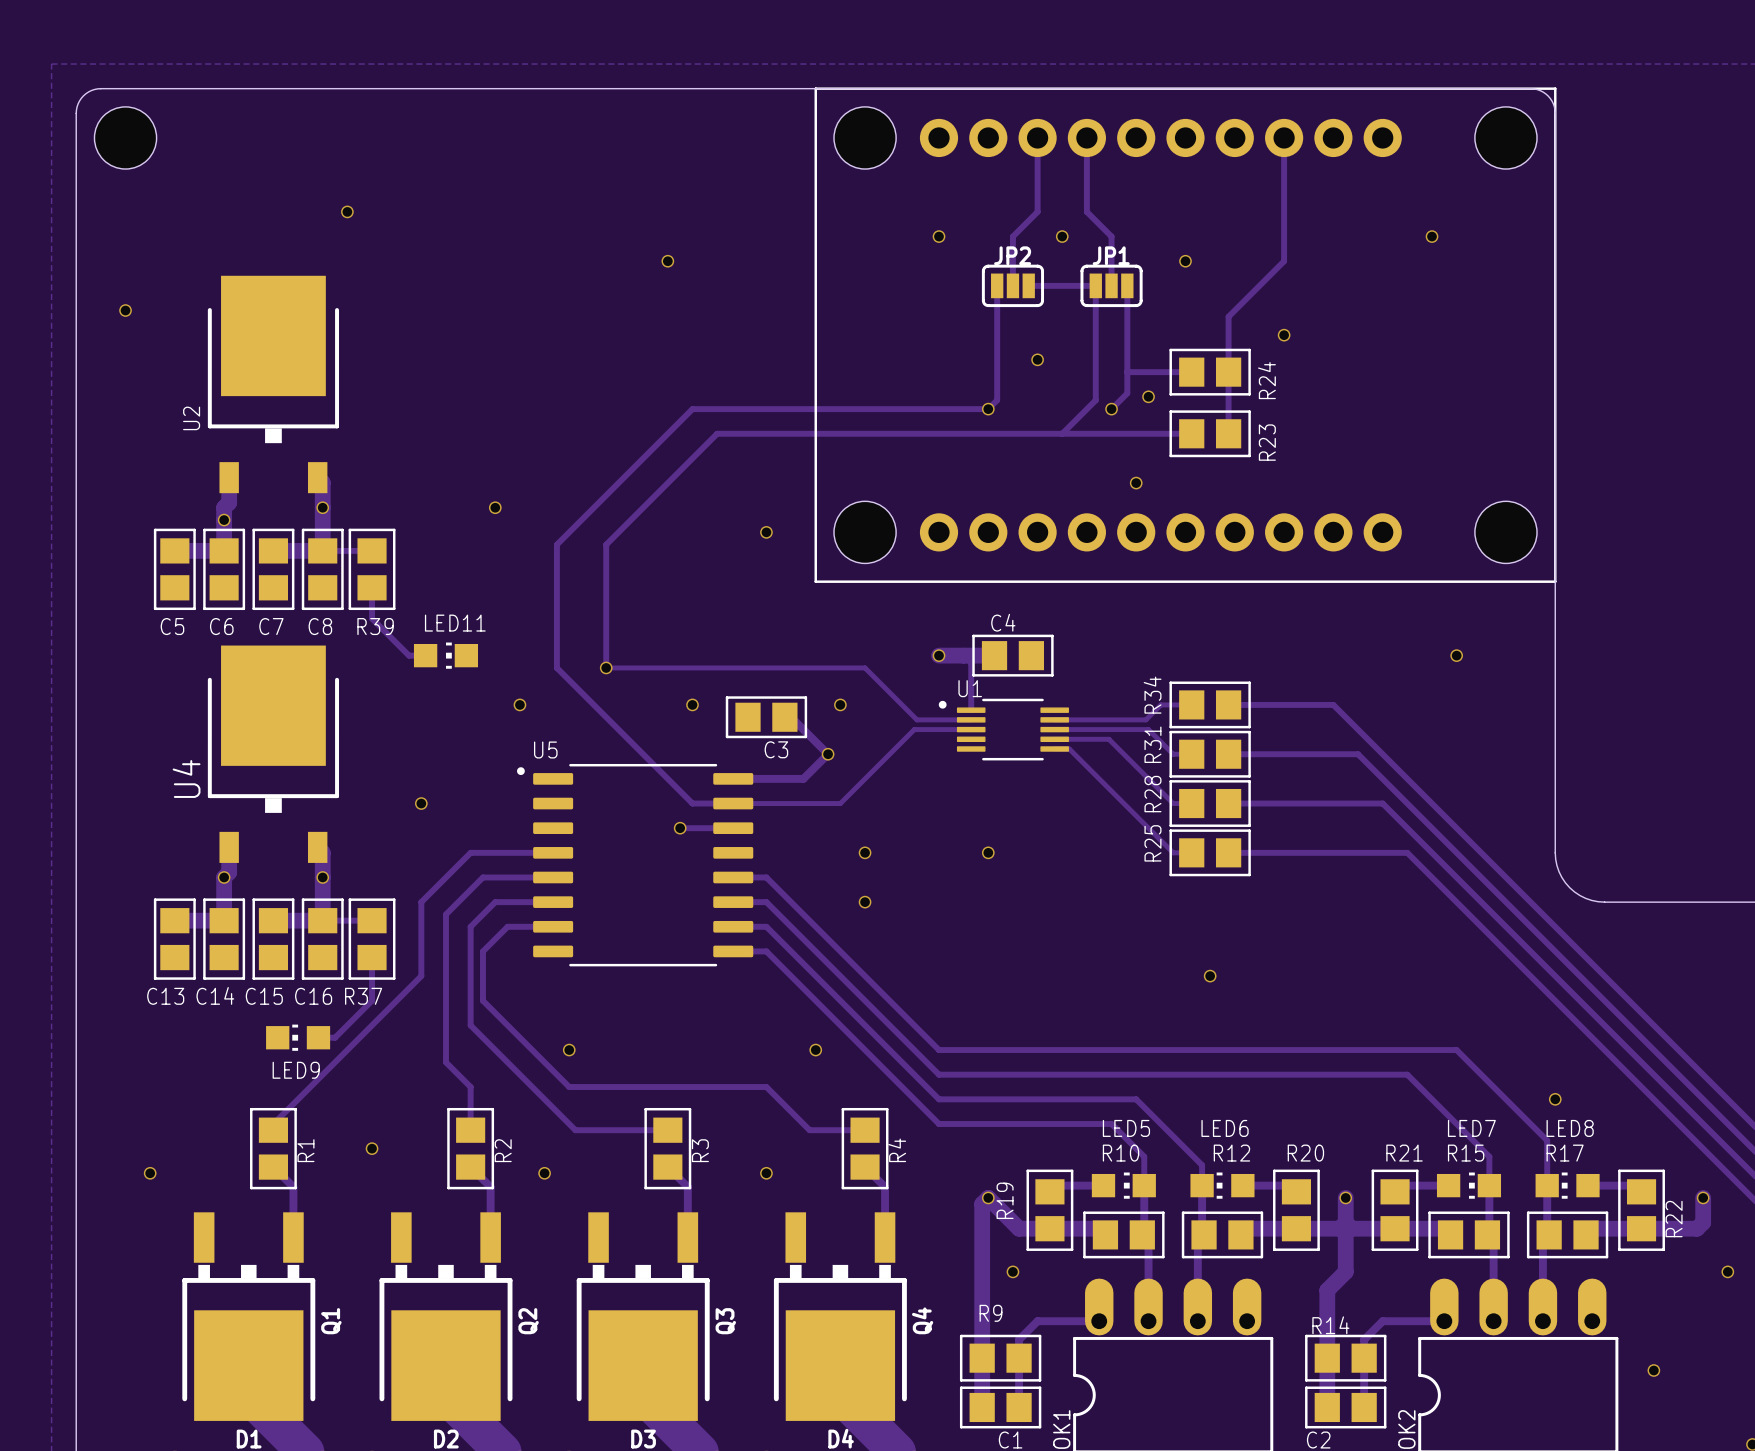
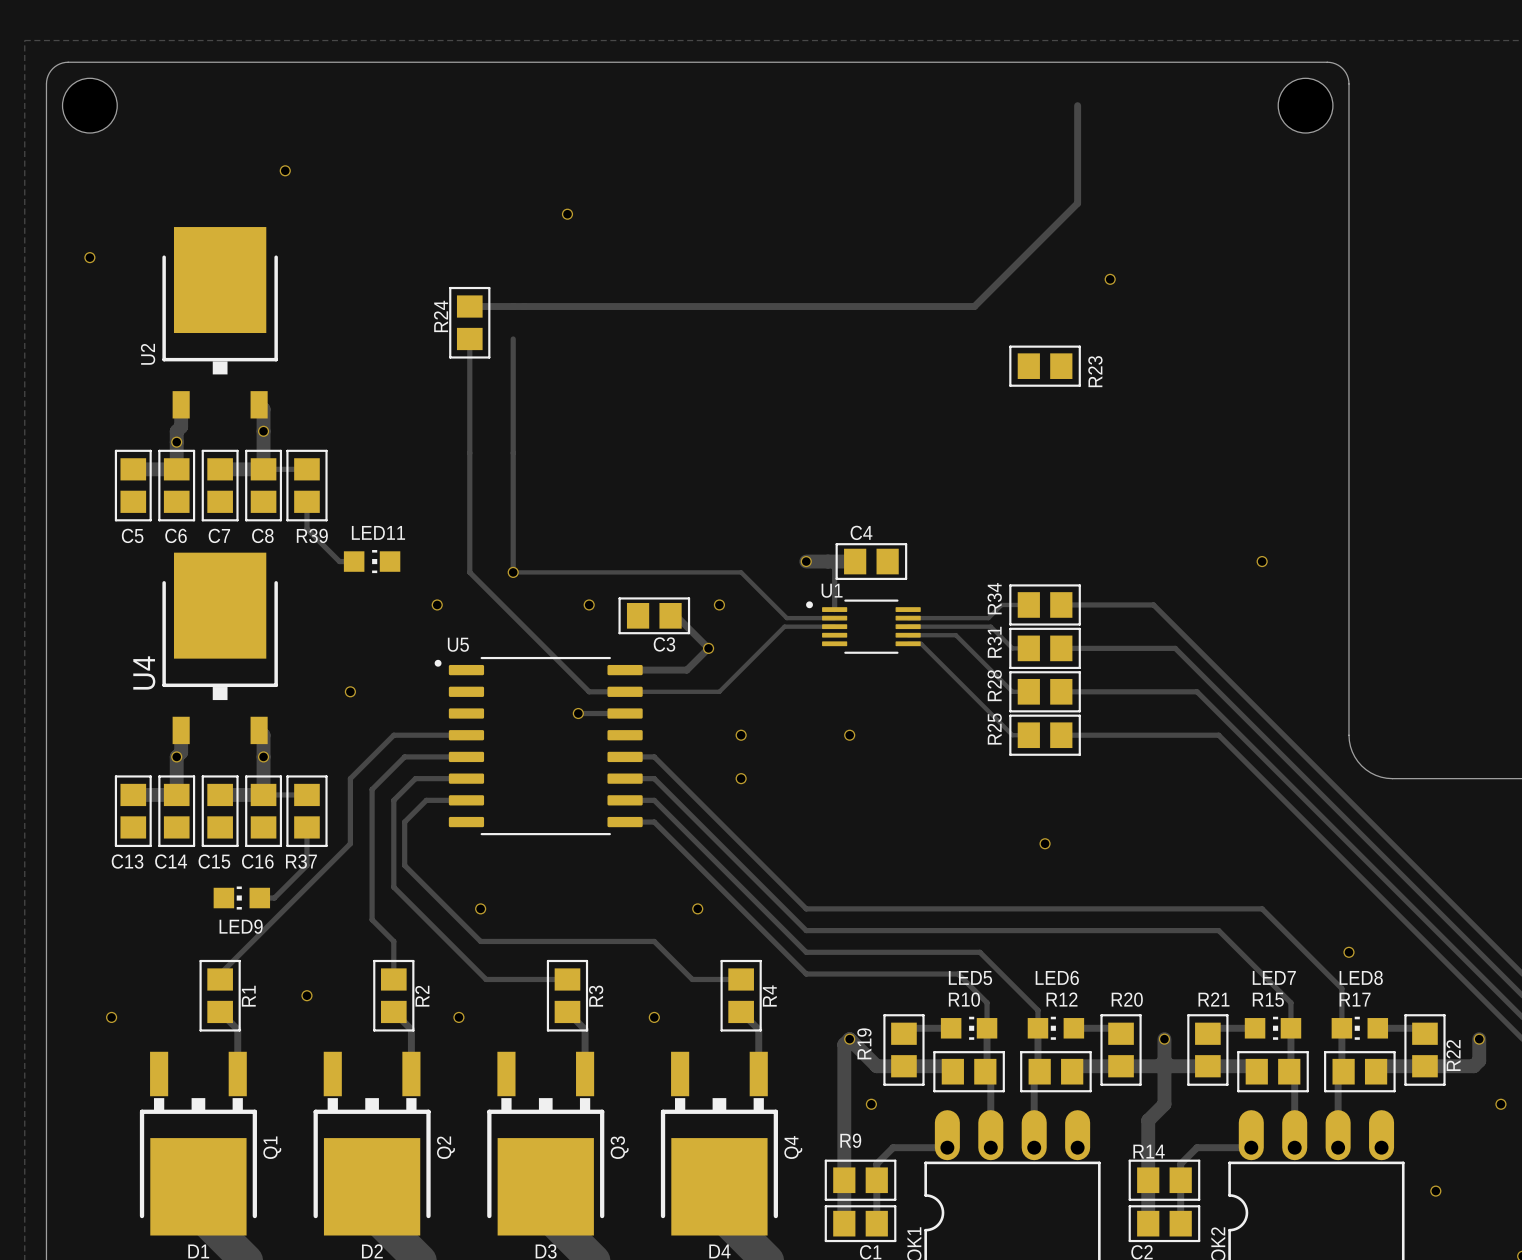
track: (1037, 137) (1037, 211) (1012, 236) (1012, 285) -> none
track: (1086, 137) (1086, 211) (1111, 236) (1111, 285) -> none
track: none -> (1077, 105) (1077, 203) (974, 306) (469, 306)
track: (1284, 137) (1284, 261) (1228, 316) (1228, 433) -> none
via: (939, 236) -> none
via: (1062, 236) -> none
via: (1432, 236) -> none
via: (1185, 261) -> none
track: (997, 285) (997, 400) (988, 409) (692, 409) (556, 544) -> (469, 338) (469, 463)
JP2: (1012, 285) -> none
track: (1028, 285) (1095, 285) (1095, 400) (1062, 433) -> none
JP1: (1111, 285) -> none
track: (1127, 285) (1127, 393) (1111, 409) -> none
part: (1185, 335) -> none
via: (1037, 359) -> none
track: (1127, 372) (1191, 372) -> none
R24 rotation: 0° (1210, 372) -> 90° clockwise (469, 322)
R24 position: (1210, 372) -> (469, 322)
R24 name position: R24 (1266, 380) -> R24 (441, 316)
via: (1148, 396) -> none
via: (988, 409) -> none
via: (1111, 409) -> none
track: (1191, 433) (717, 433) (606, 544) -> (513, 338) (513, 463)
via: (1136, 483) -> none
via: (495, 507) -> none
via: (766, 532) -> none

